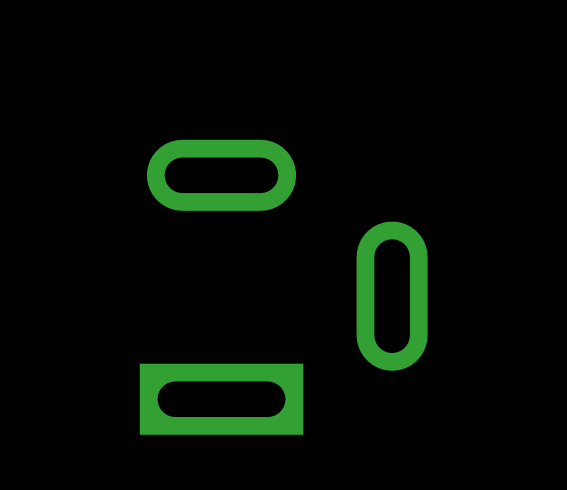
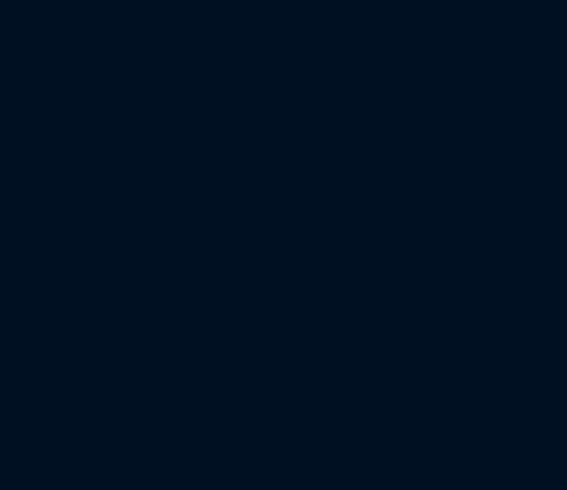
part: (283, 287) -> none

